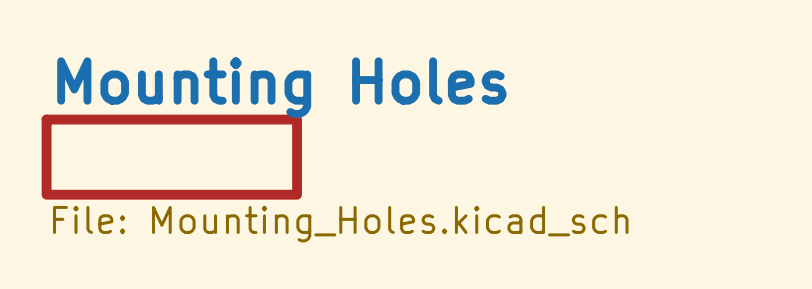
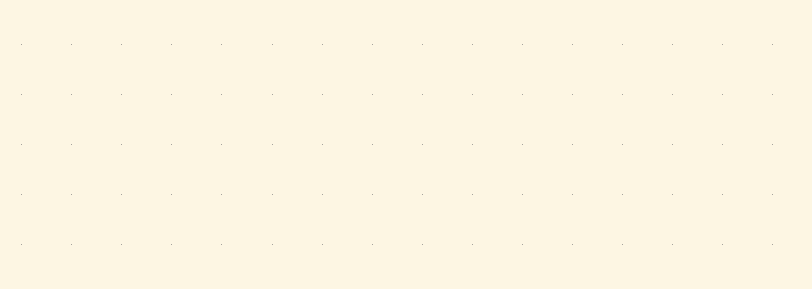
sheet Mounting Holes: File: Mounting_Holes.kicad_sch (171, 157) -> none

